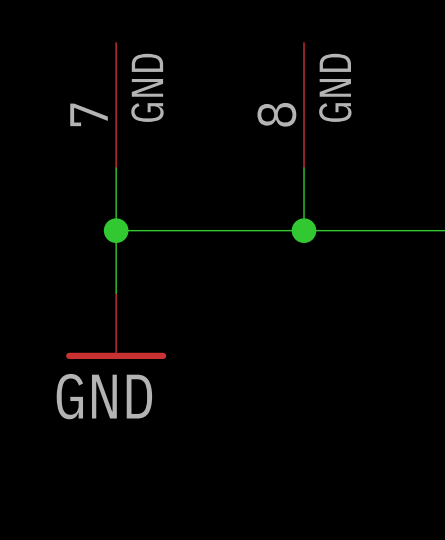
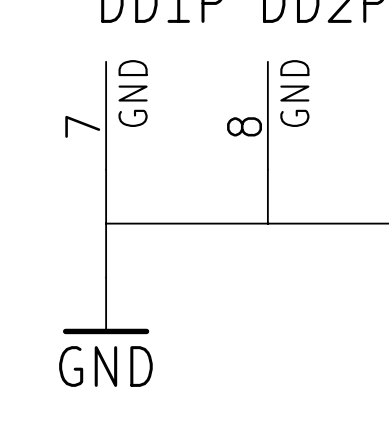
junction: (116, 230) -> none
junction: (304, 230) -> none

